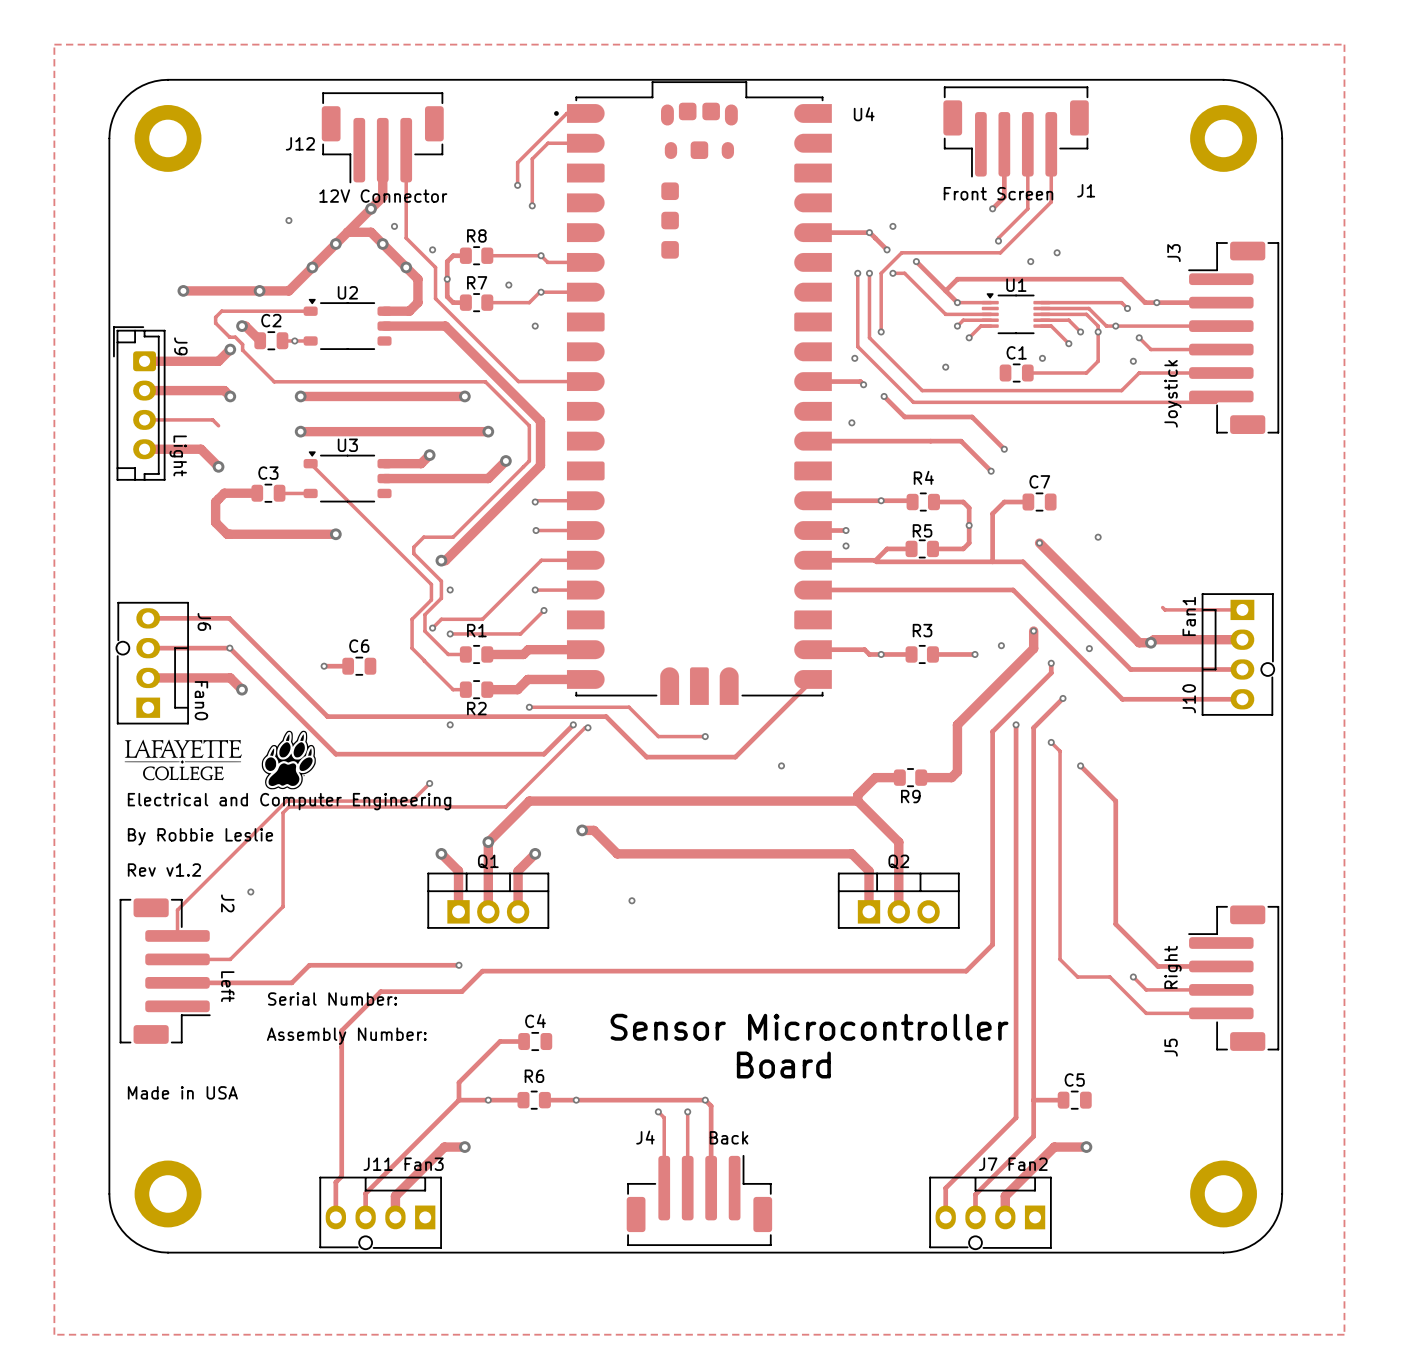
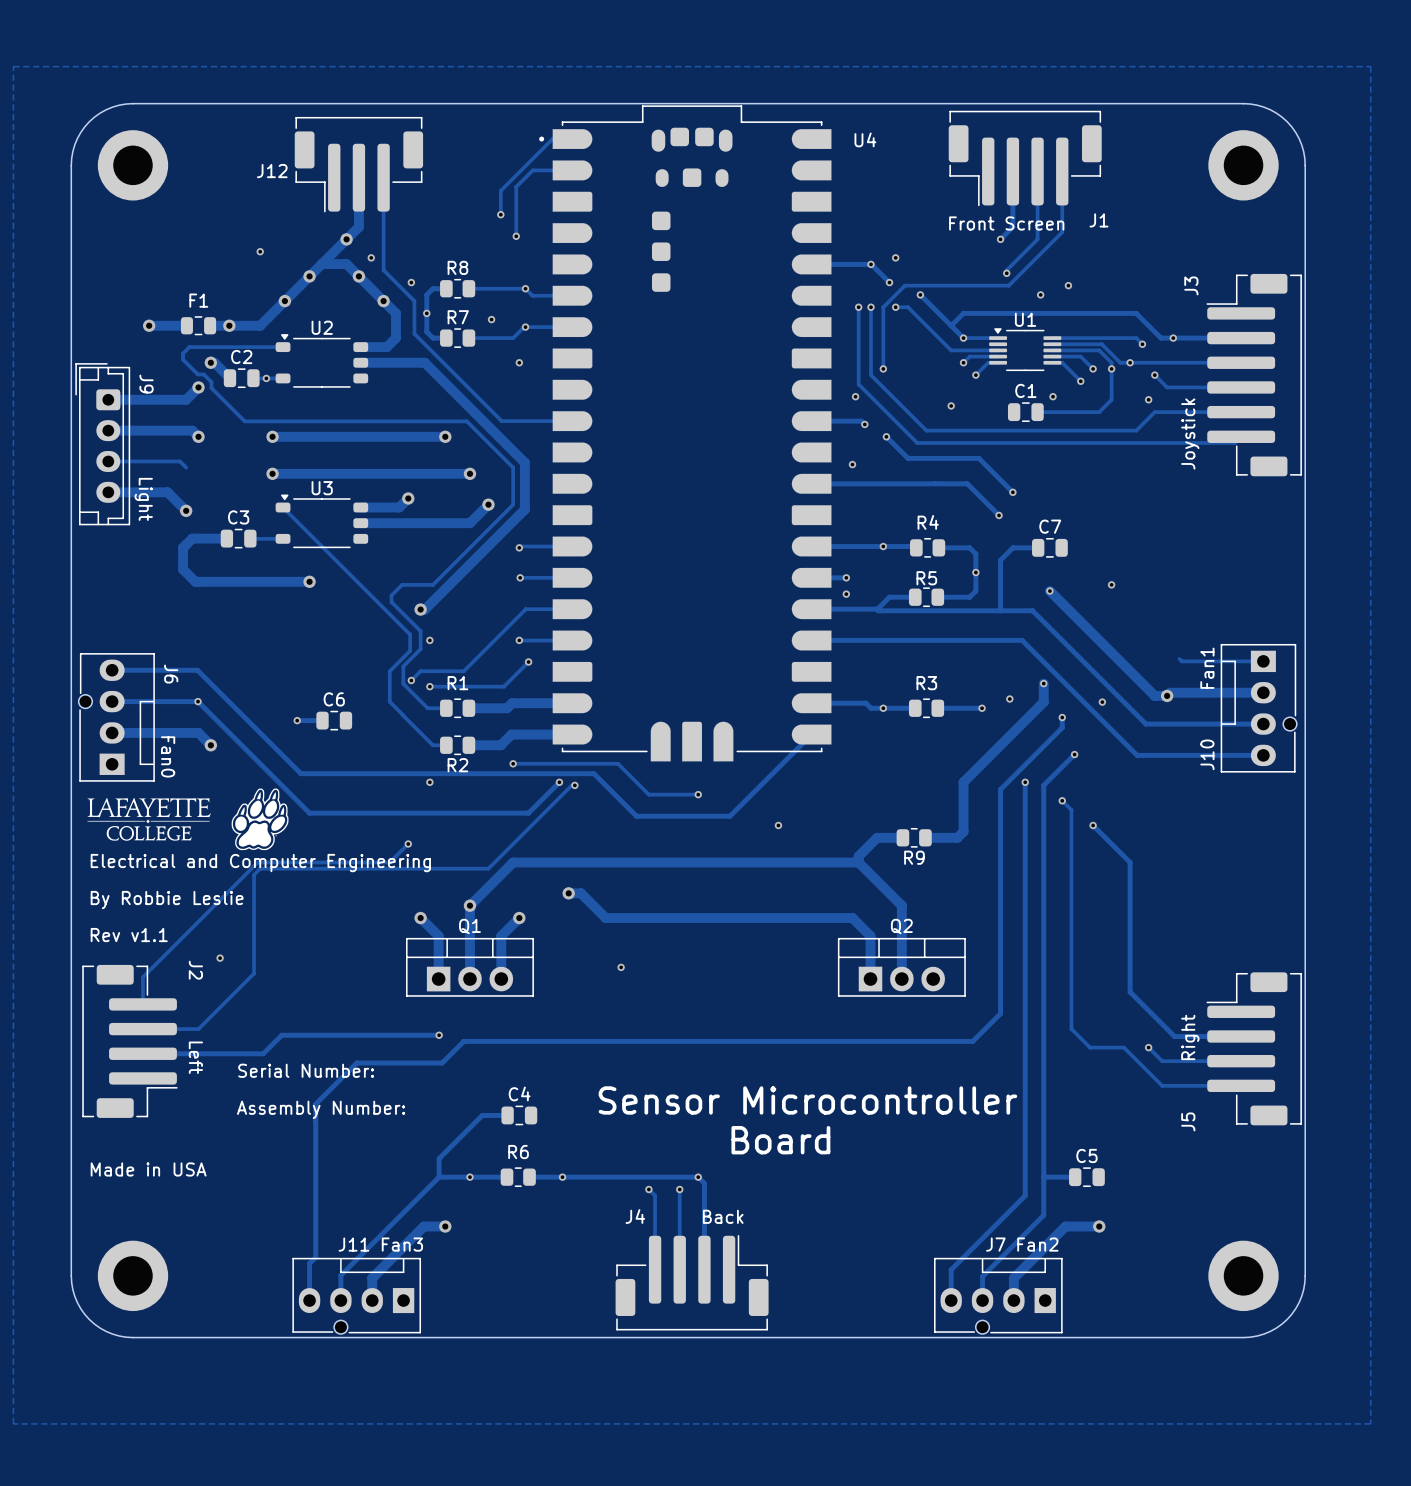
J12 value: 12V Connector (383, 196) -> none
track: (219, 290) (241, 290) -> none
F1: none -> (198, 325)
text: Rev v1.2 (164, 870) -> Rev v1.1 (129, 935)

